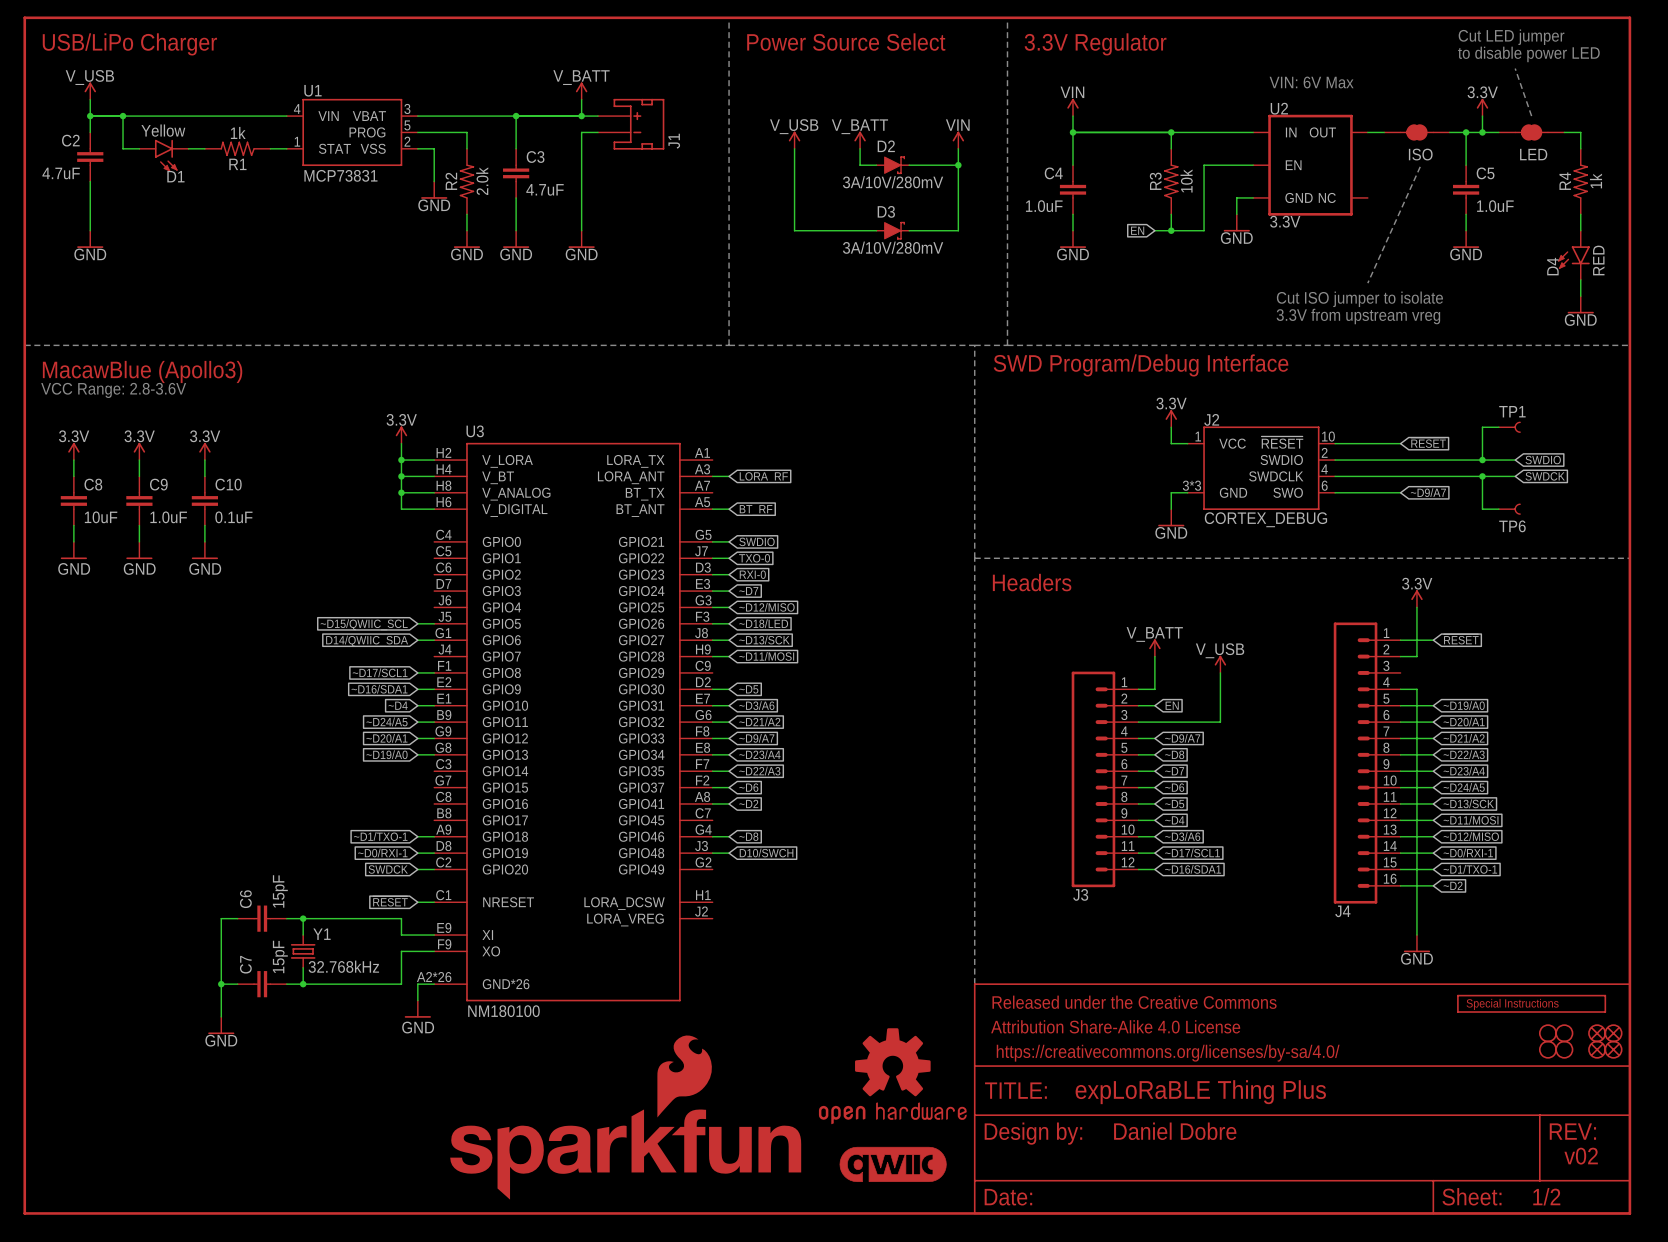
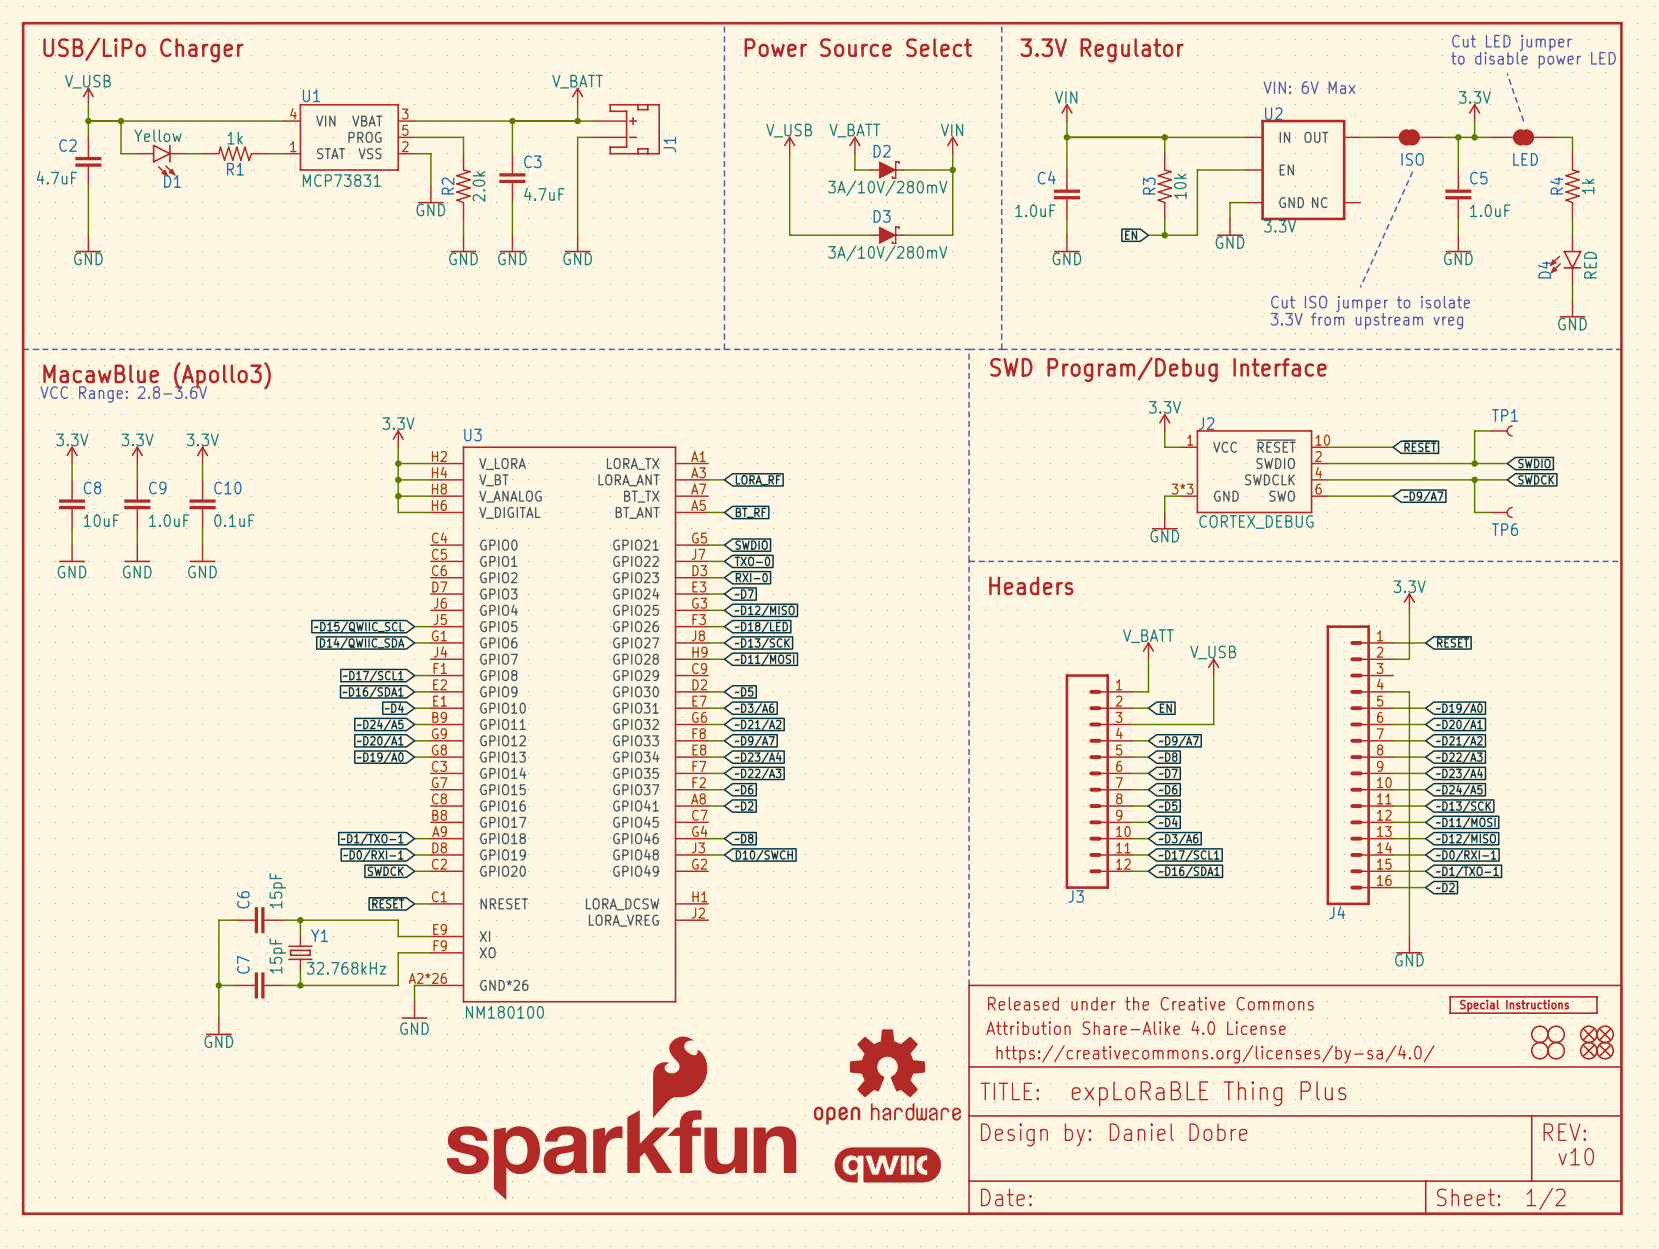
text: v02 (1581, 1156) -> v10 (1576, 1156)

